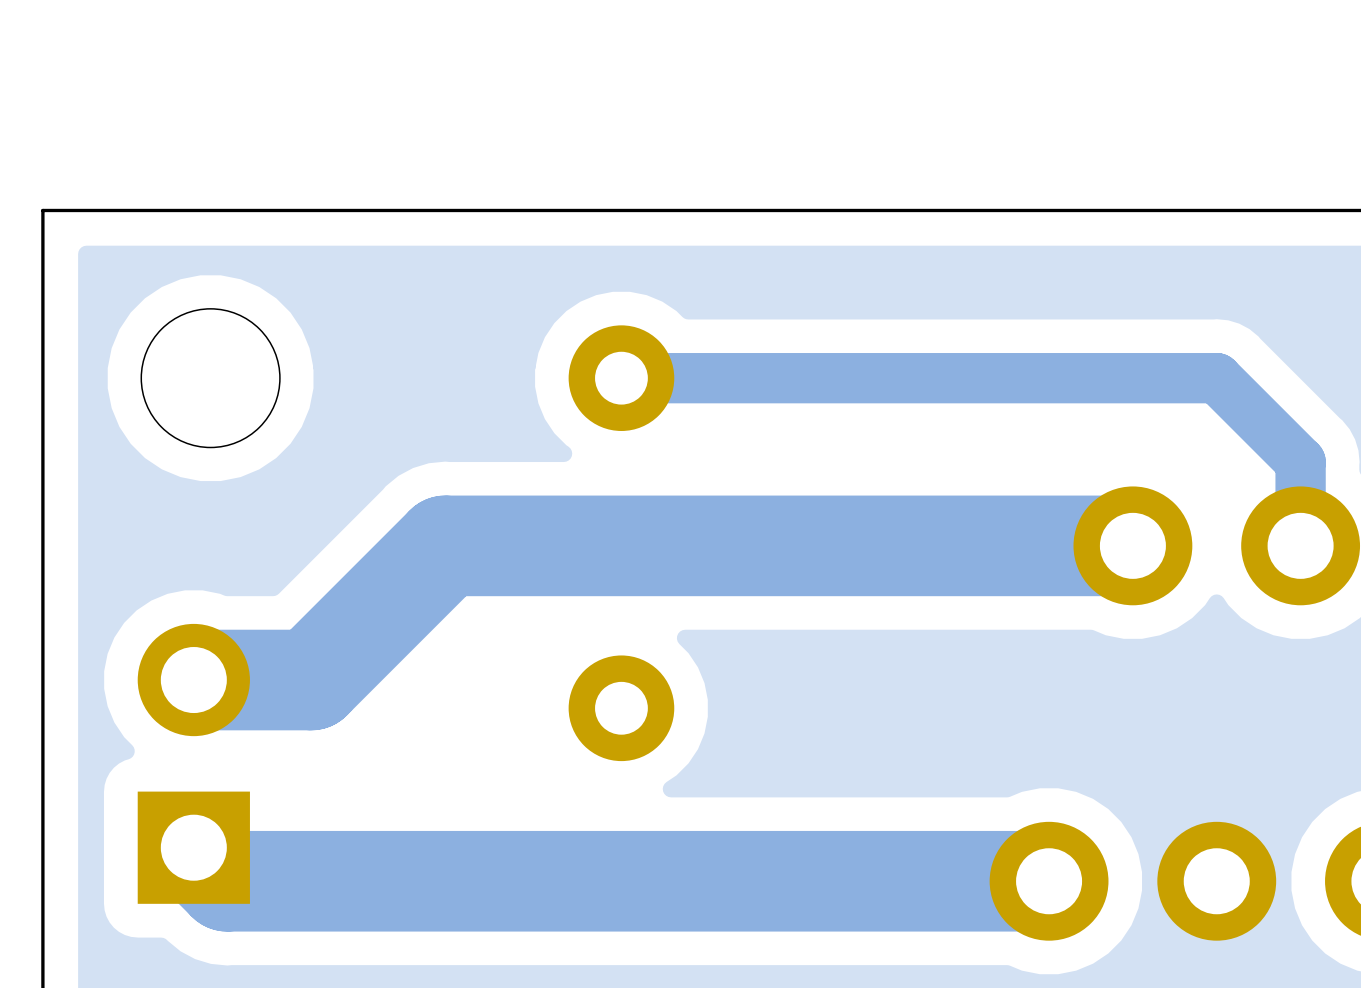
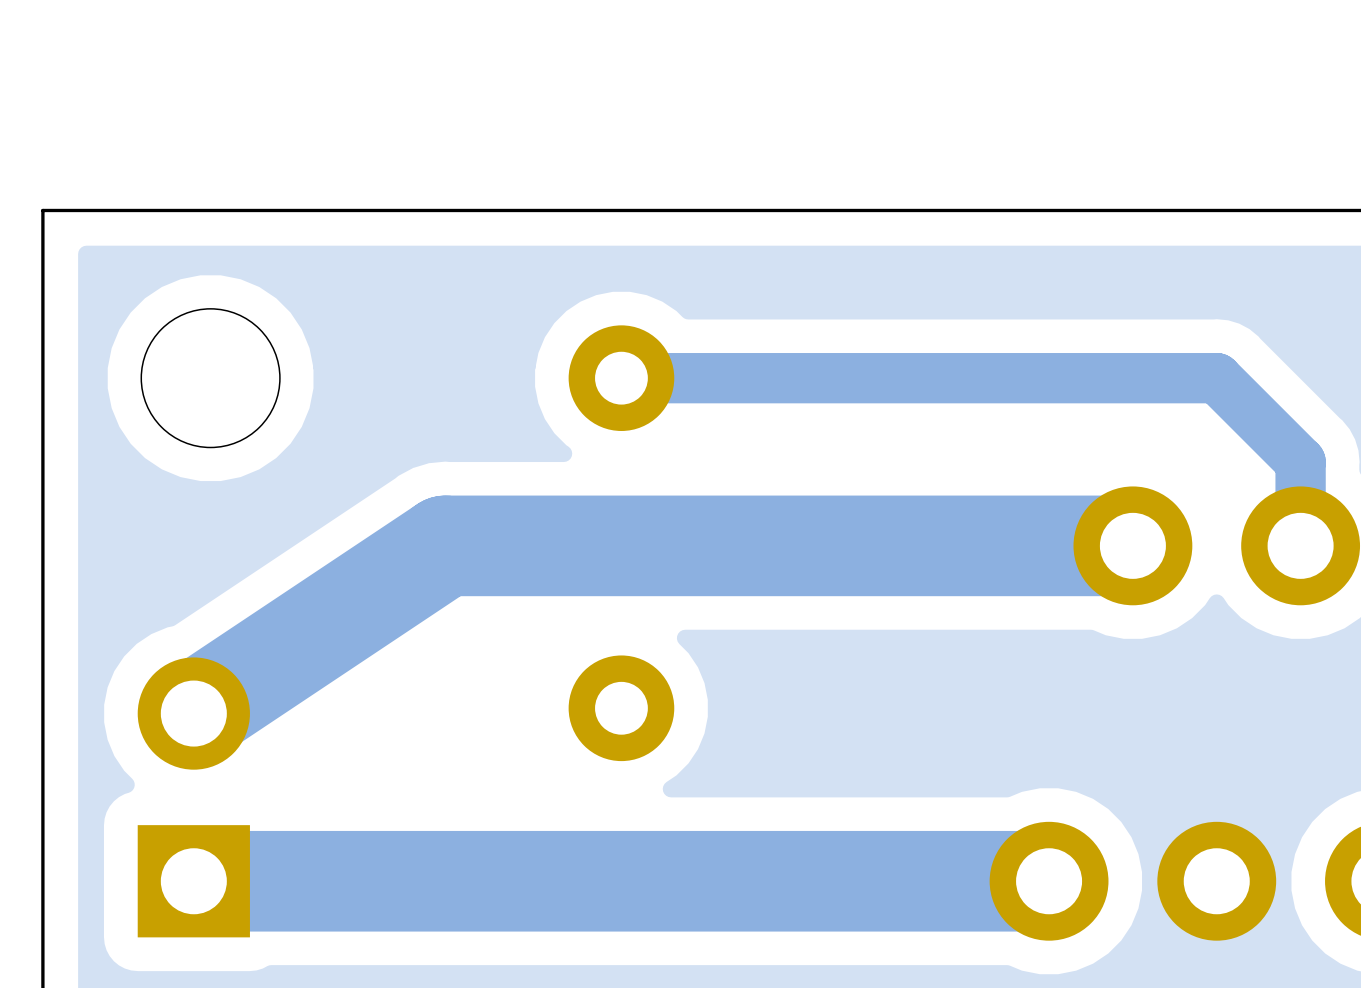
track: (445, 545) (311, 680) (193, 680) -> (445, 545) (193, 713)
part position: (193, 763) -> (193, 797)

